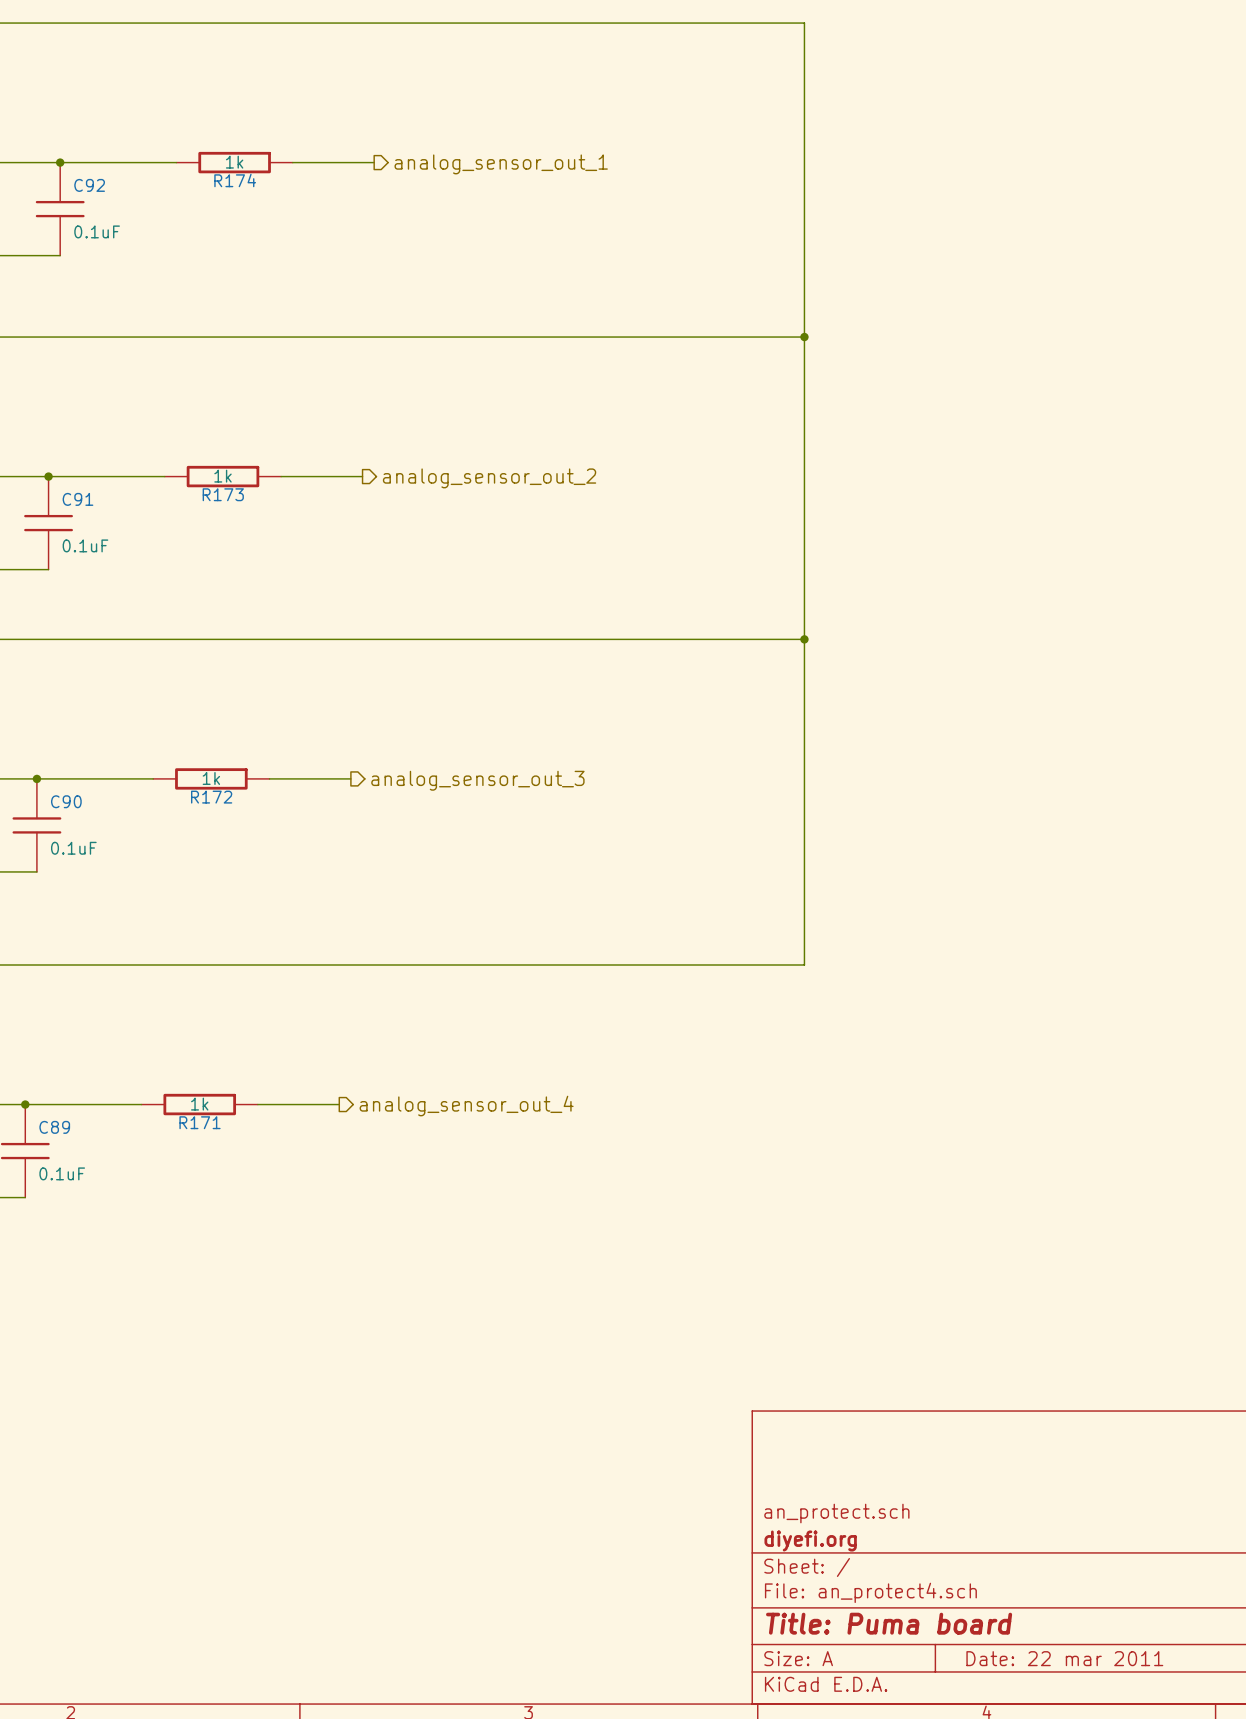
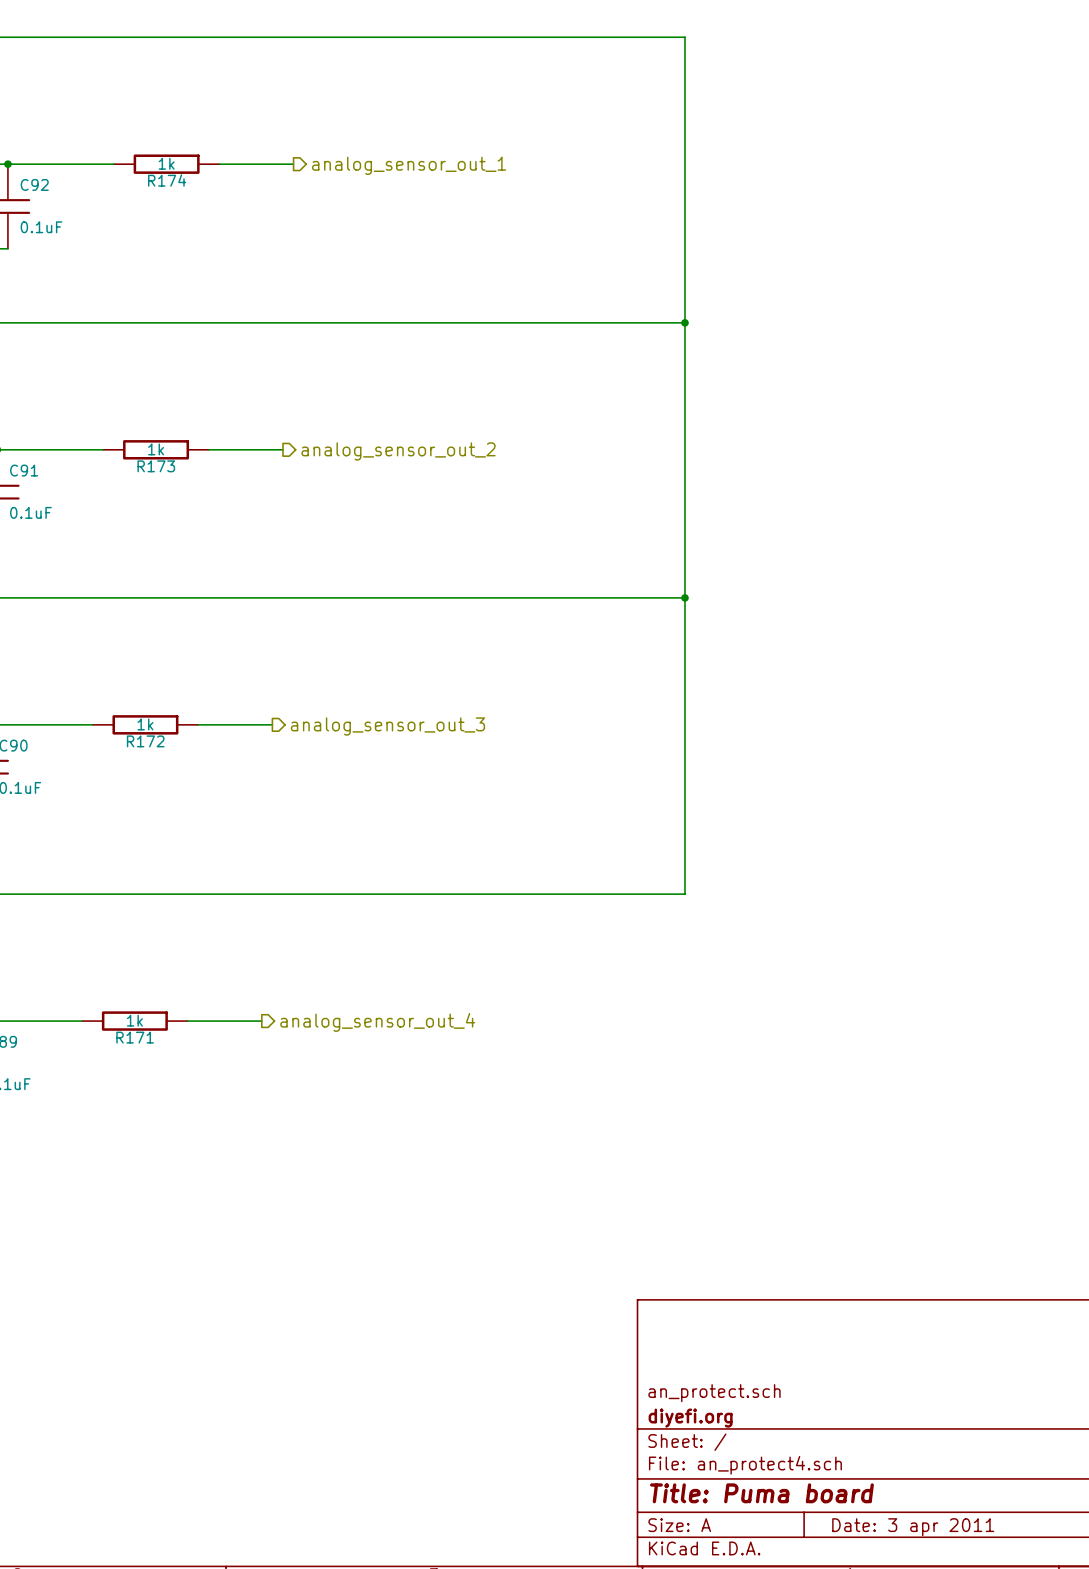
title block: Date: 22 mar 2011 (1064, 1658) -> Date: 3 apr 2011 (913, 1527)

